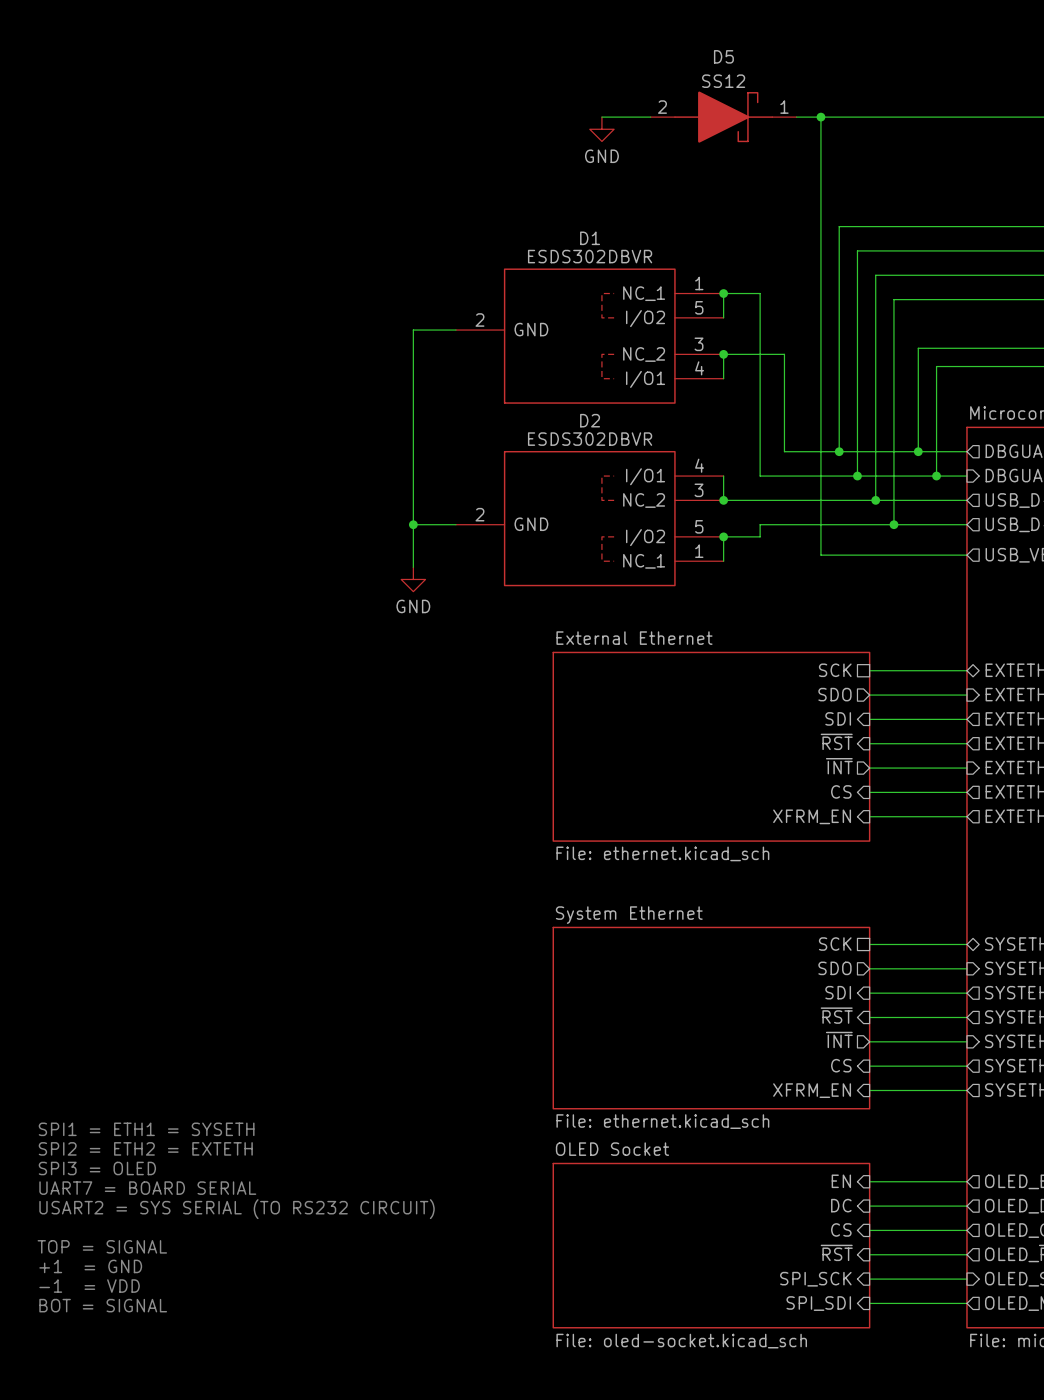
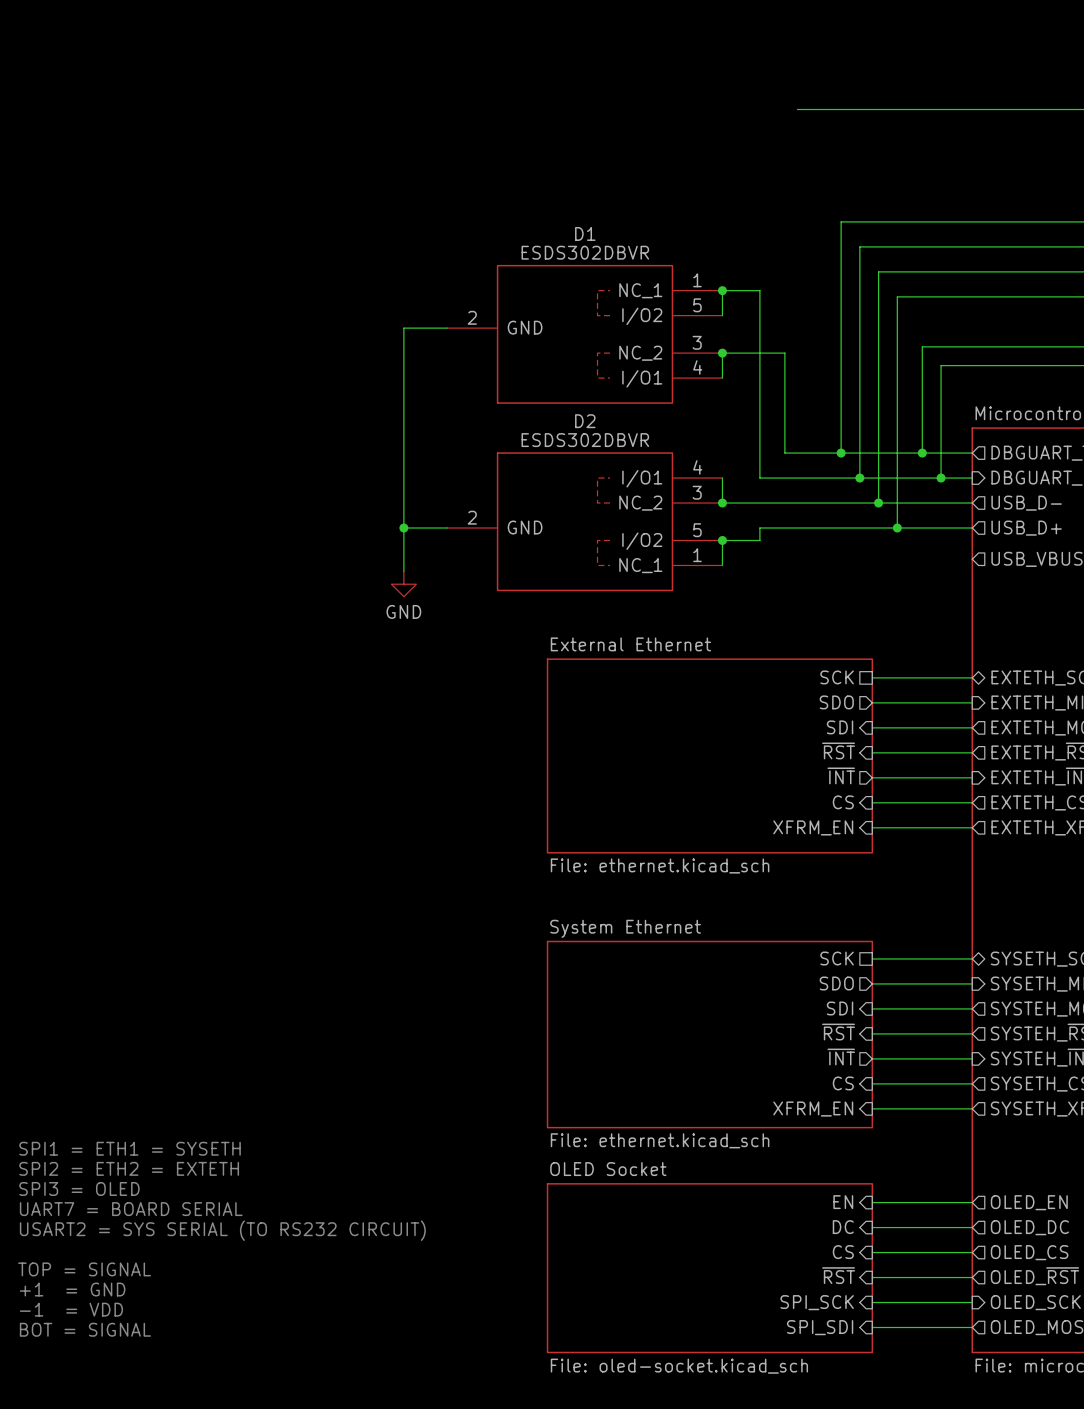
wire: (601, 117) (650, 117) -> none
D5: SS12 (723, 117) -> none
wire: (820, 117) (820, 555) (966, 555) -> none
junction: (820, 117) -> none
power symbol: GND (601, 129) -> none

